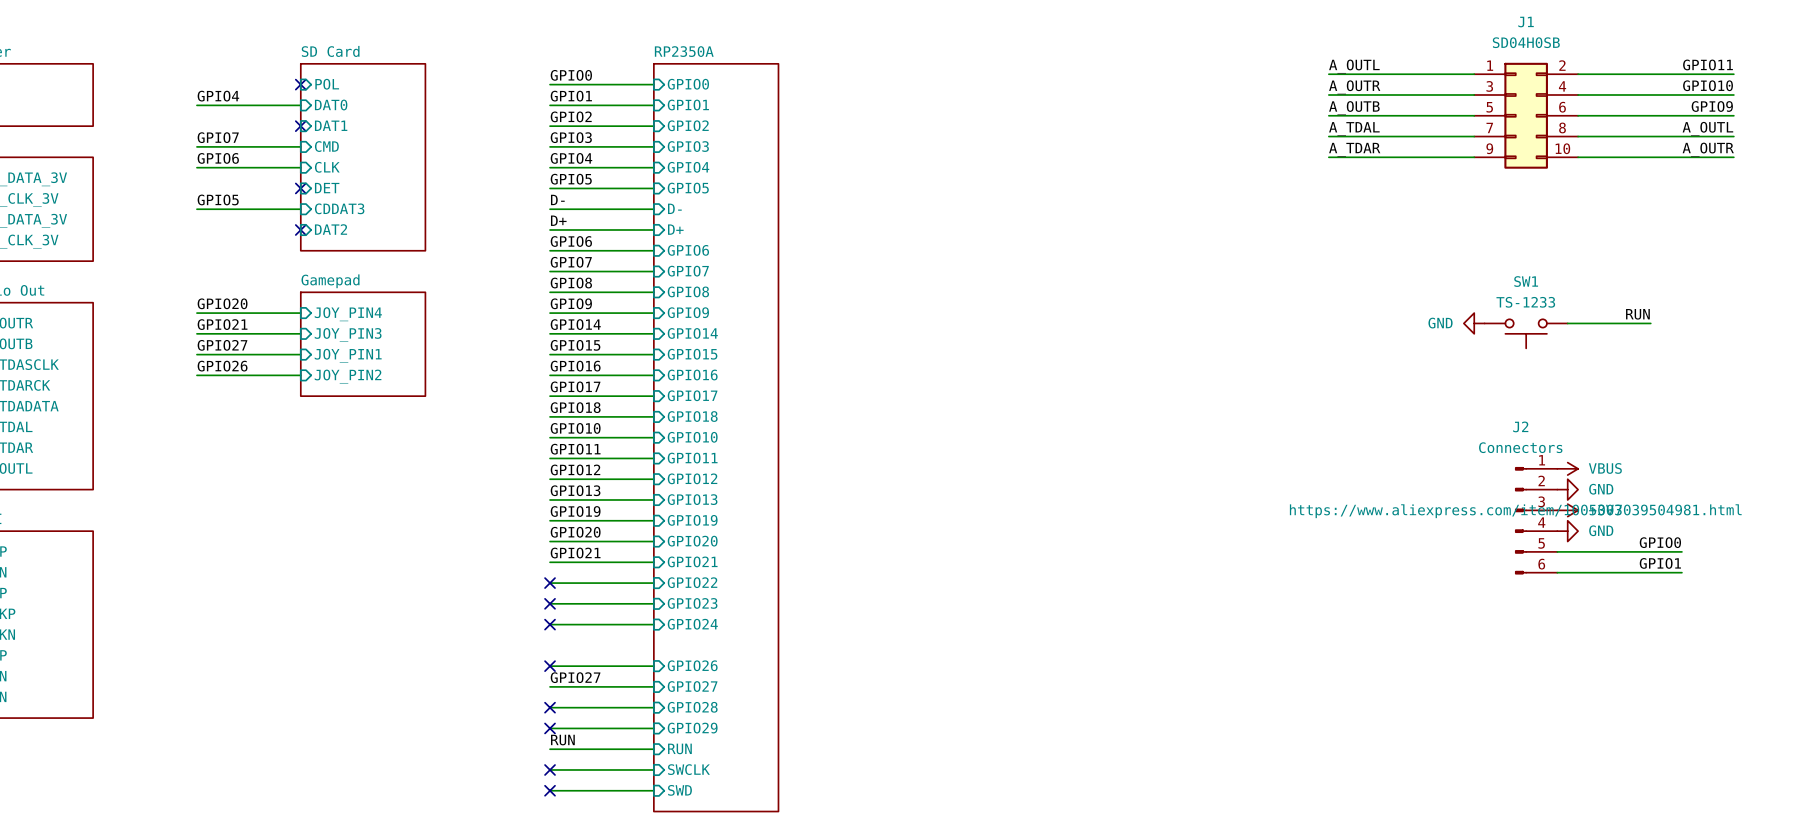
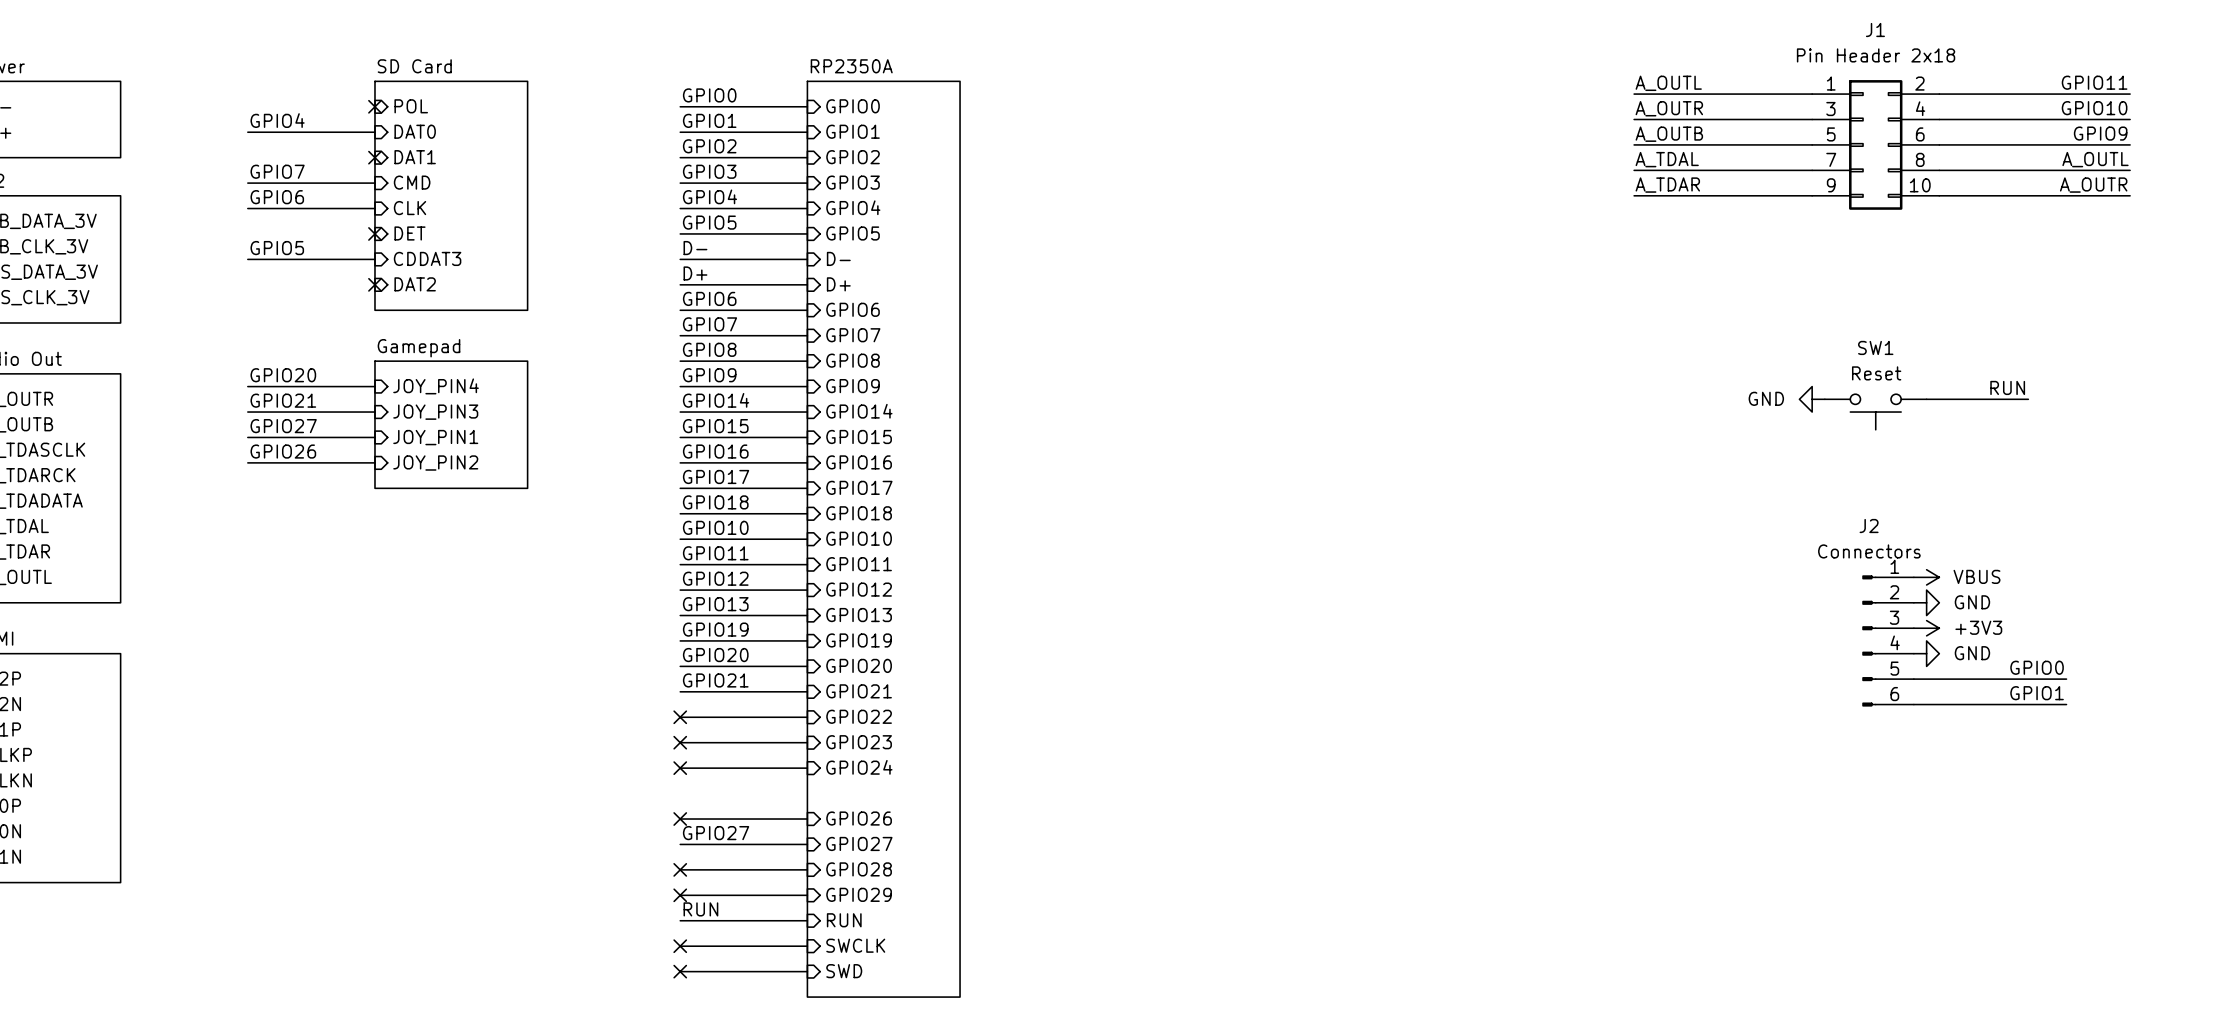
J1 value: SD04H0SB (1526, 42) -> Pin Header 2x18 (1876, 55)
SW1 value: TS-1233 (1525, 302) -> Reset (1876, 373)
J2 text: https://www.aliexpress.com/item/1005007039504981.html (1515, 511) -> none

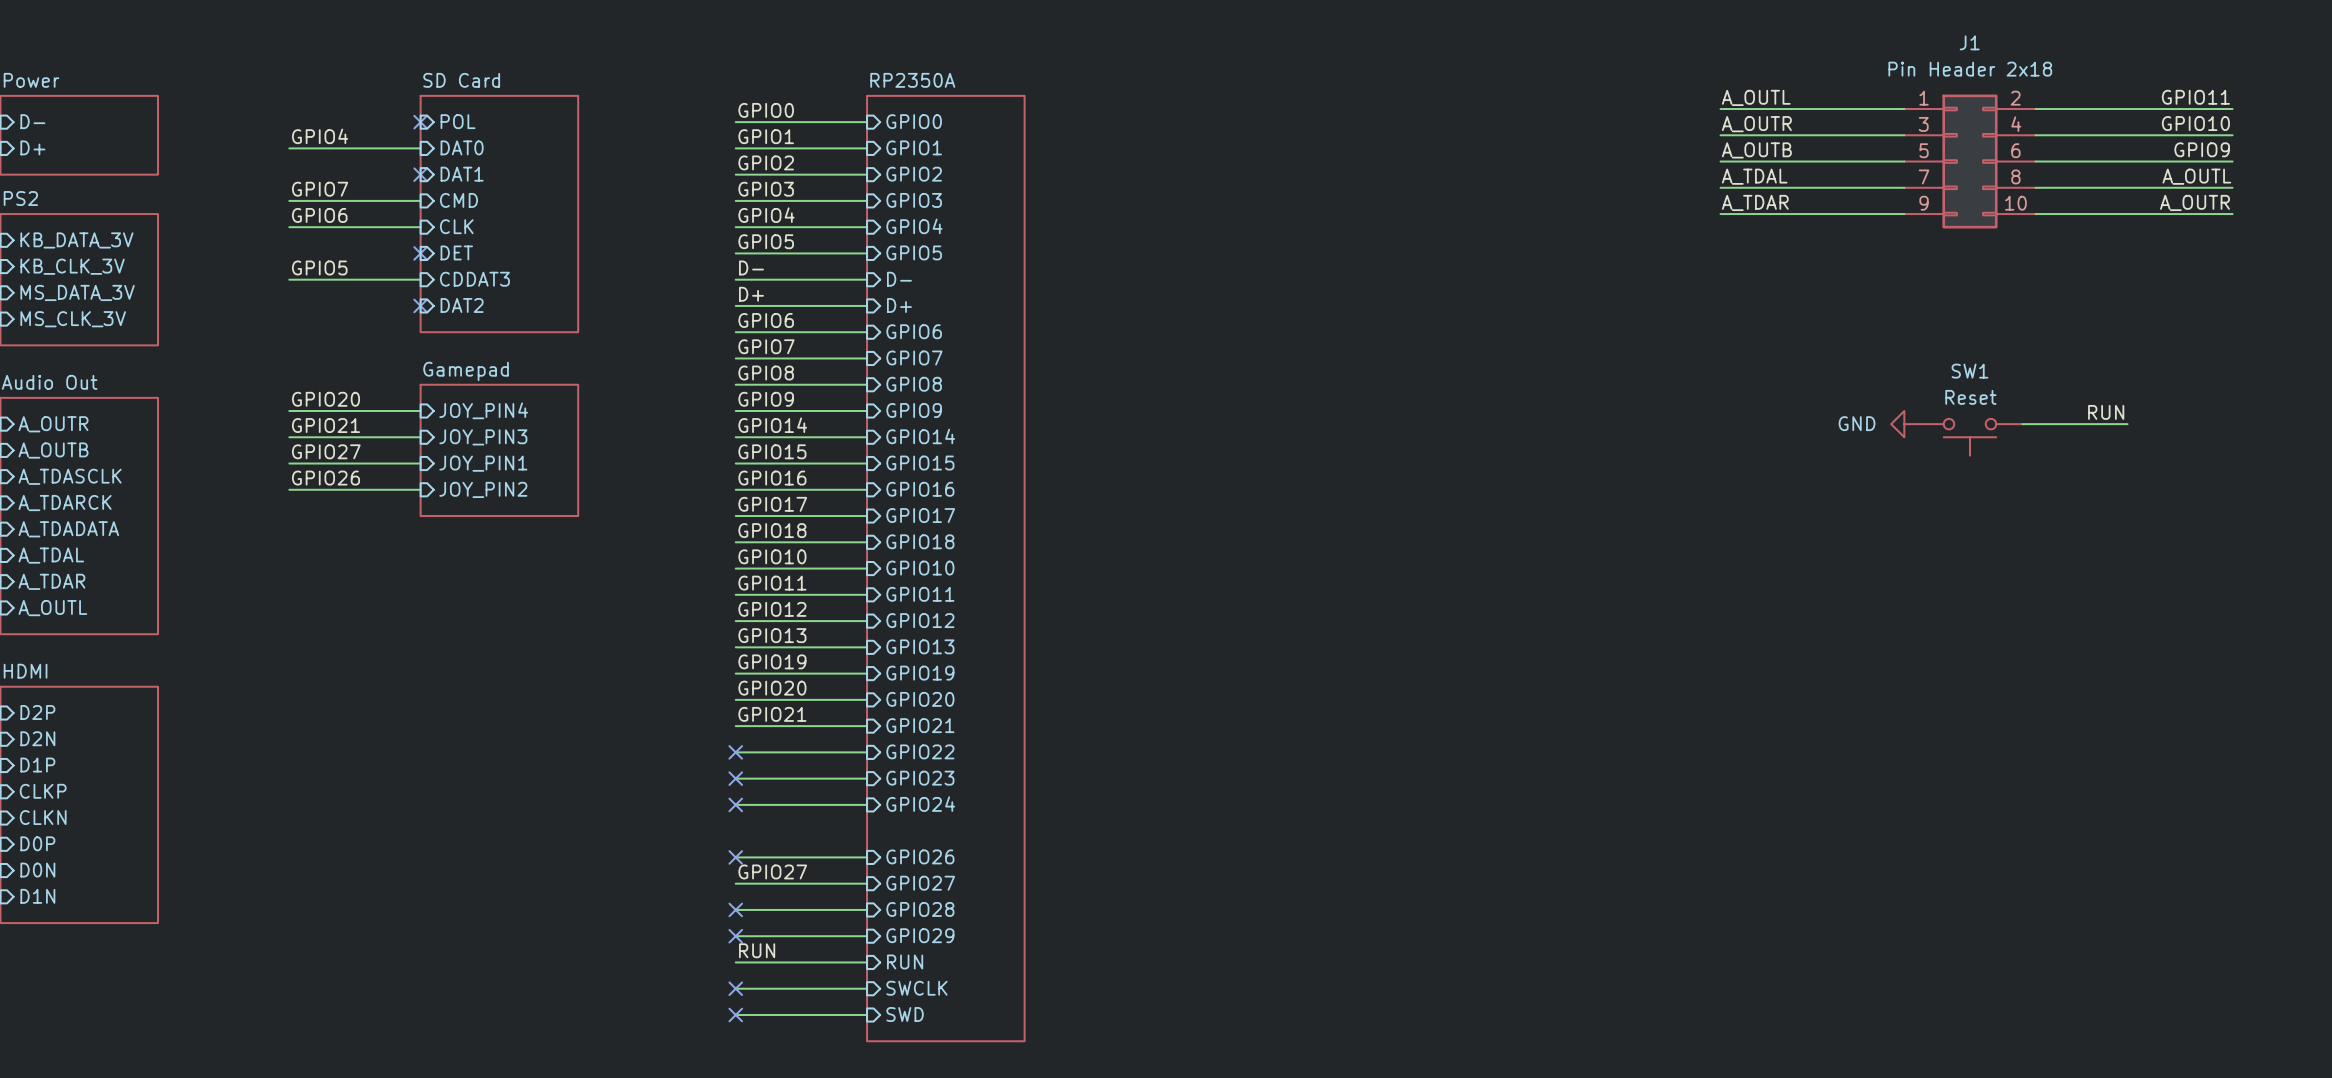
power symbol: VBUS (1926, 577) -> none
power symbol: GND (1926, 602) -> none
power symbol: +3V3 (1926, 628) -> none
J2: Connectors (1888, 640) -> none
power symbol: GND (1926, 653) -> none
label: GPIO0 (2037, 667) -> none
wire: (1913, 679) (2066, 679) -> none
label: GPIO1 (2037, 693) -> none
wire: (1913, 704) (2066, 704) -> none

